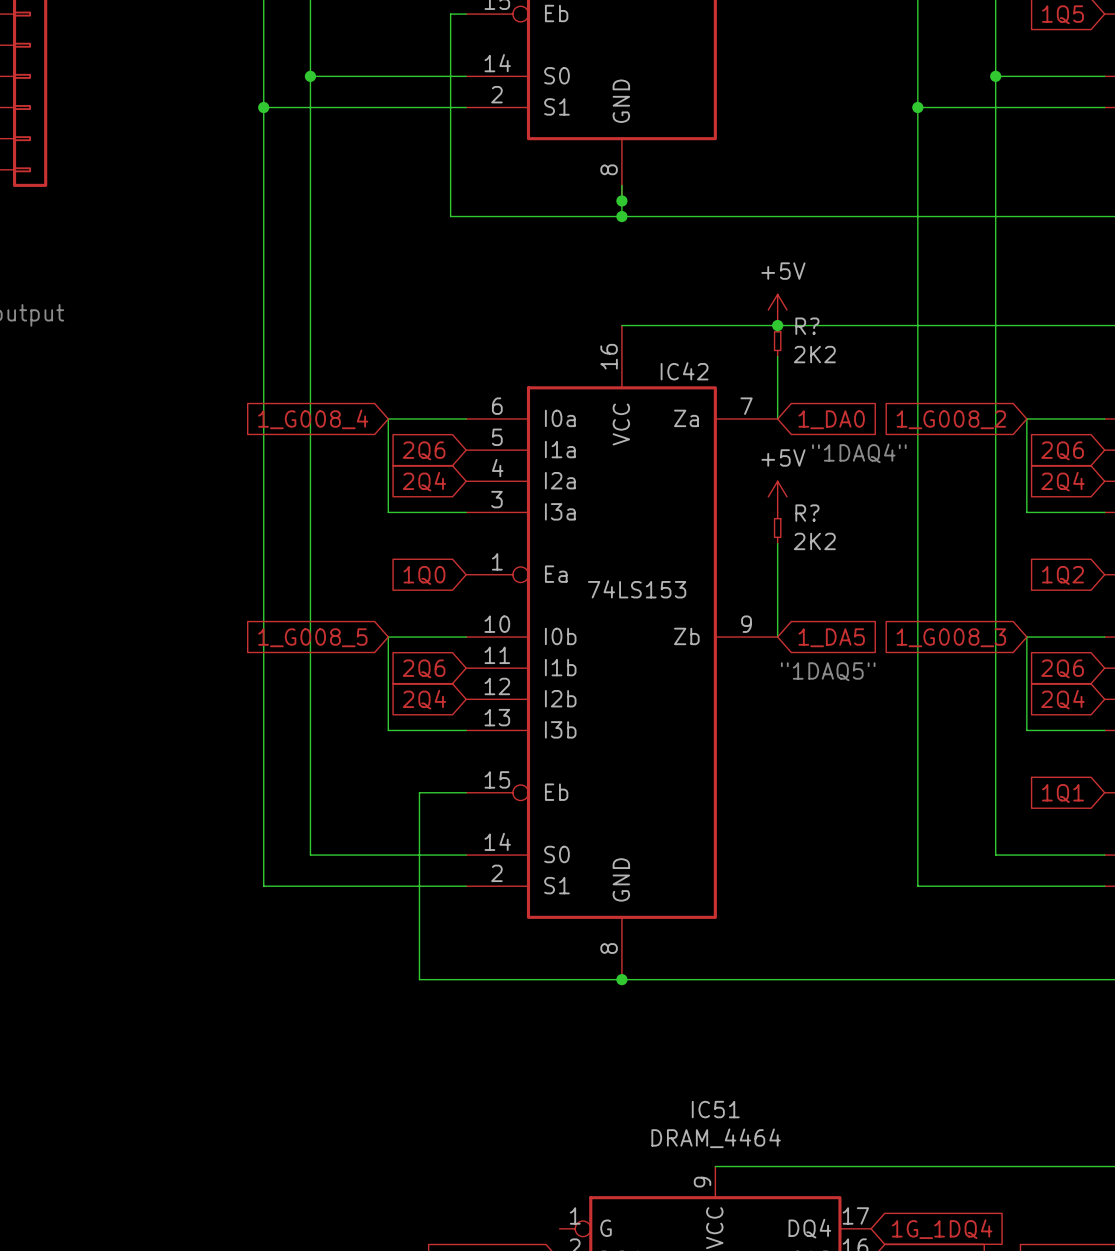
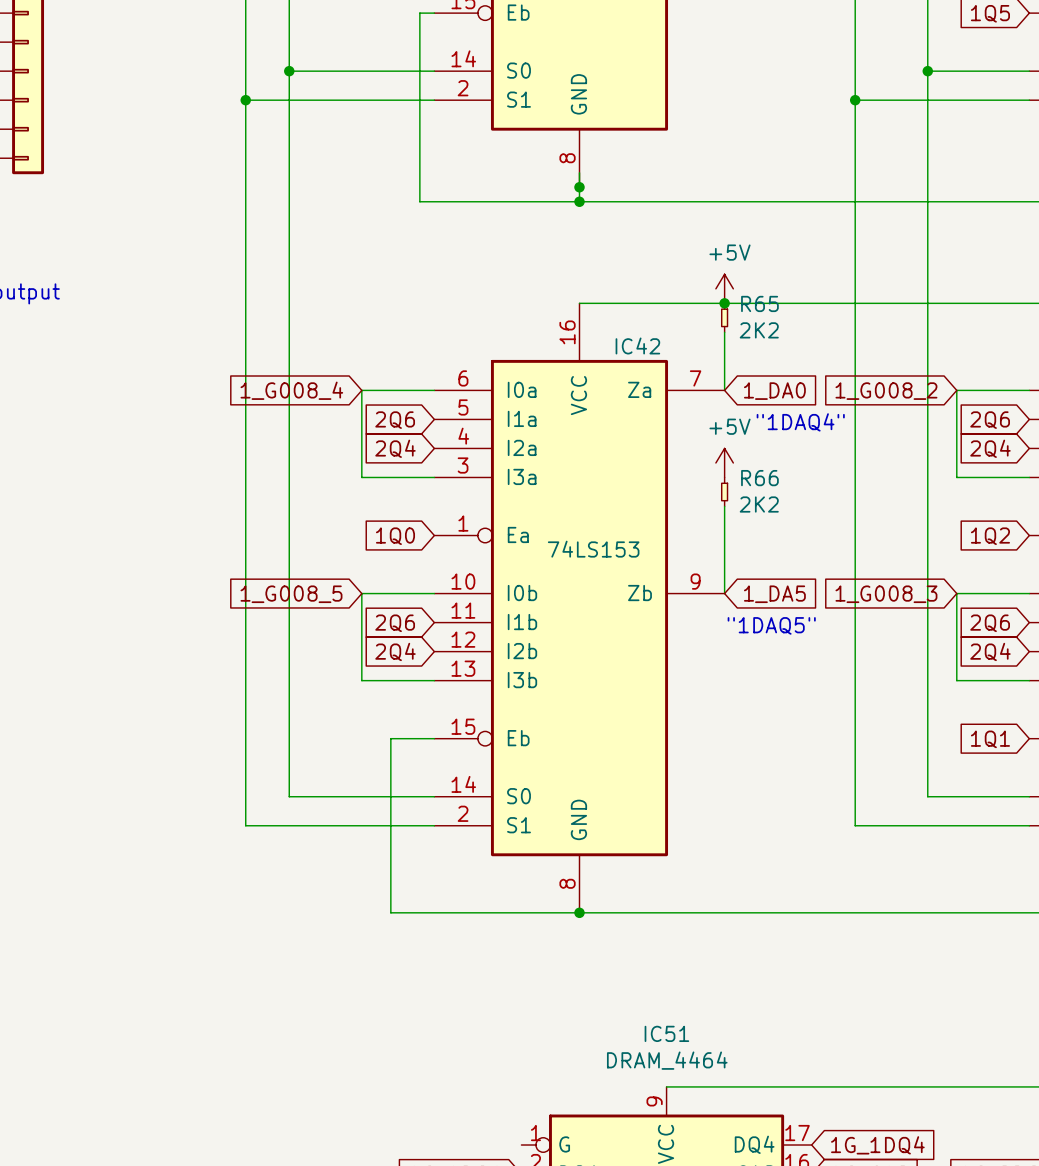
R? name: R? (807, 326) -> R65 (759, 303)
R? name: R? (807, 513) -> R66 (759, 478)

